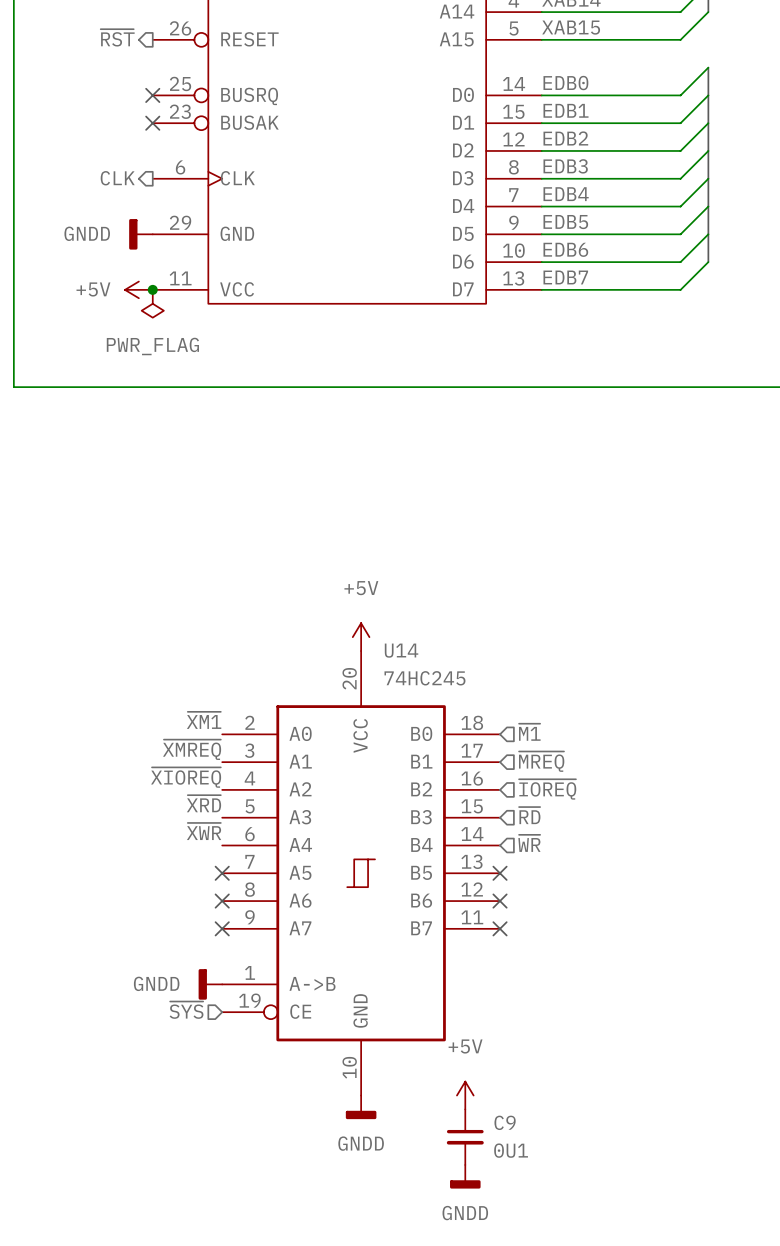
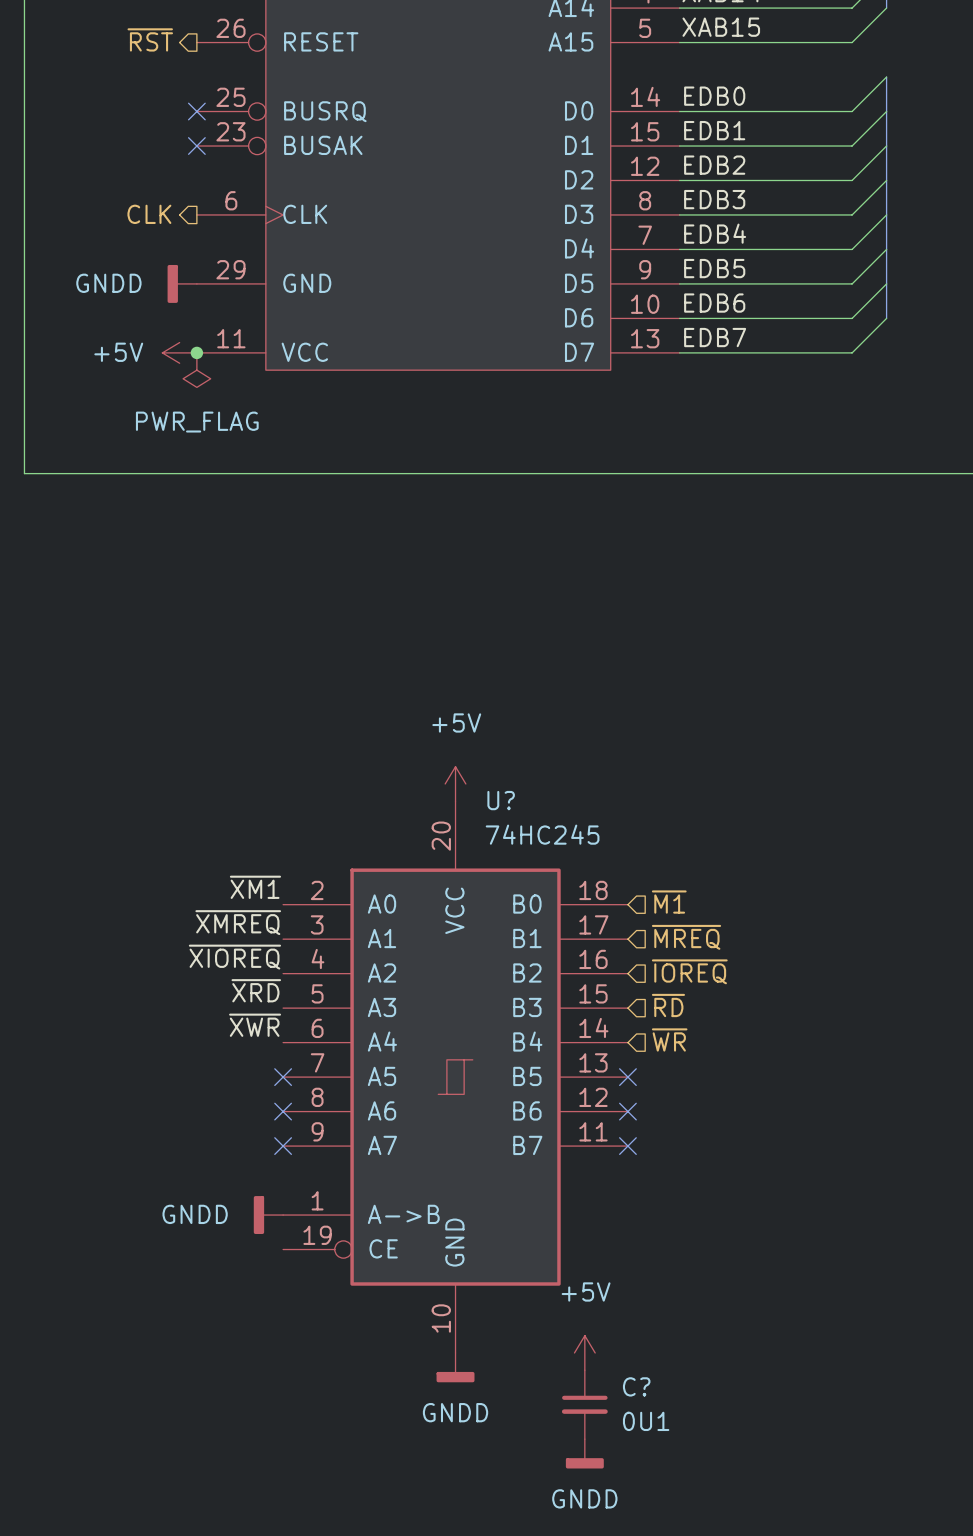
U14 name: U14 (401, 650) -> U? (501, 800)
hierarchical label: ~{SYS} (186, 1010) -> none
C9 name: C9 (505, 1122) -> C? (636, 1386)

